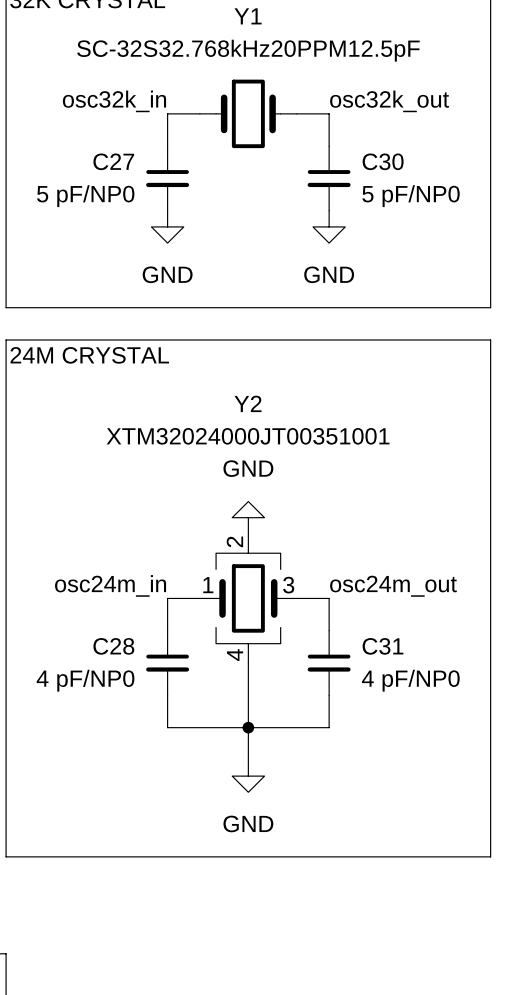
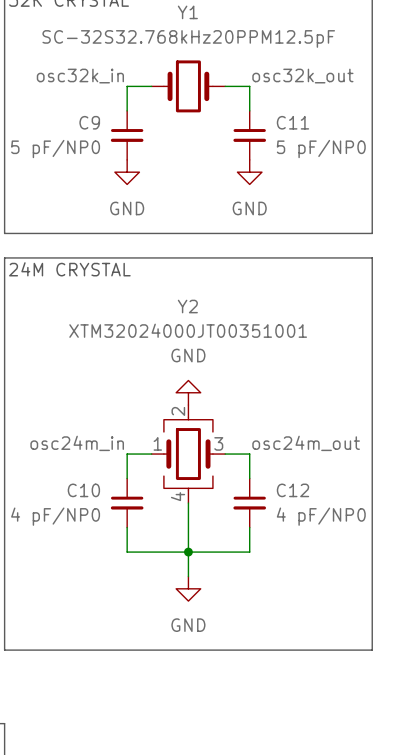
C27 name: C27 (113, 161) -> C9 (89, 122)
C30 name: C30 (383, 161) -> C11 (292, 122)
C28 name: C28 (113, 646) -> C10 (83, 490)
C31 name: C31 (382, 646) -> C12 (292, 490)

